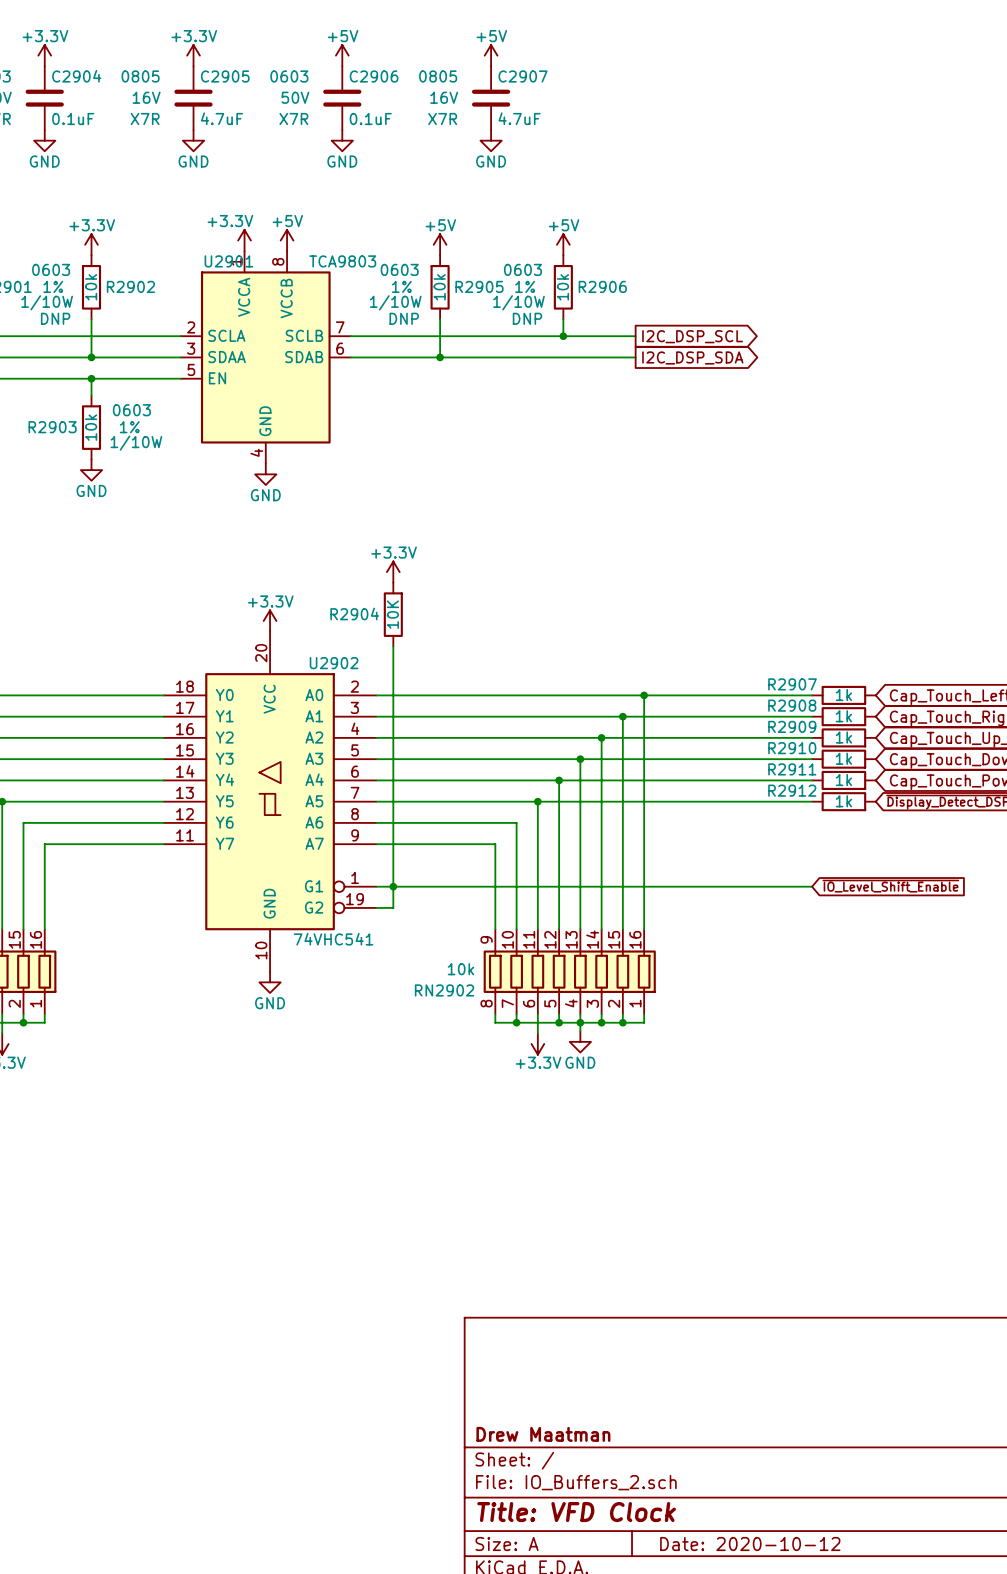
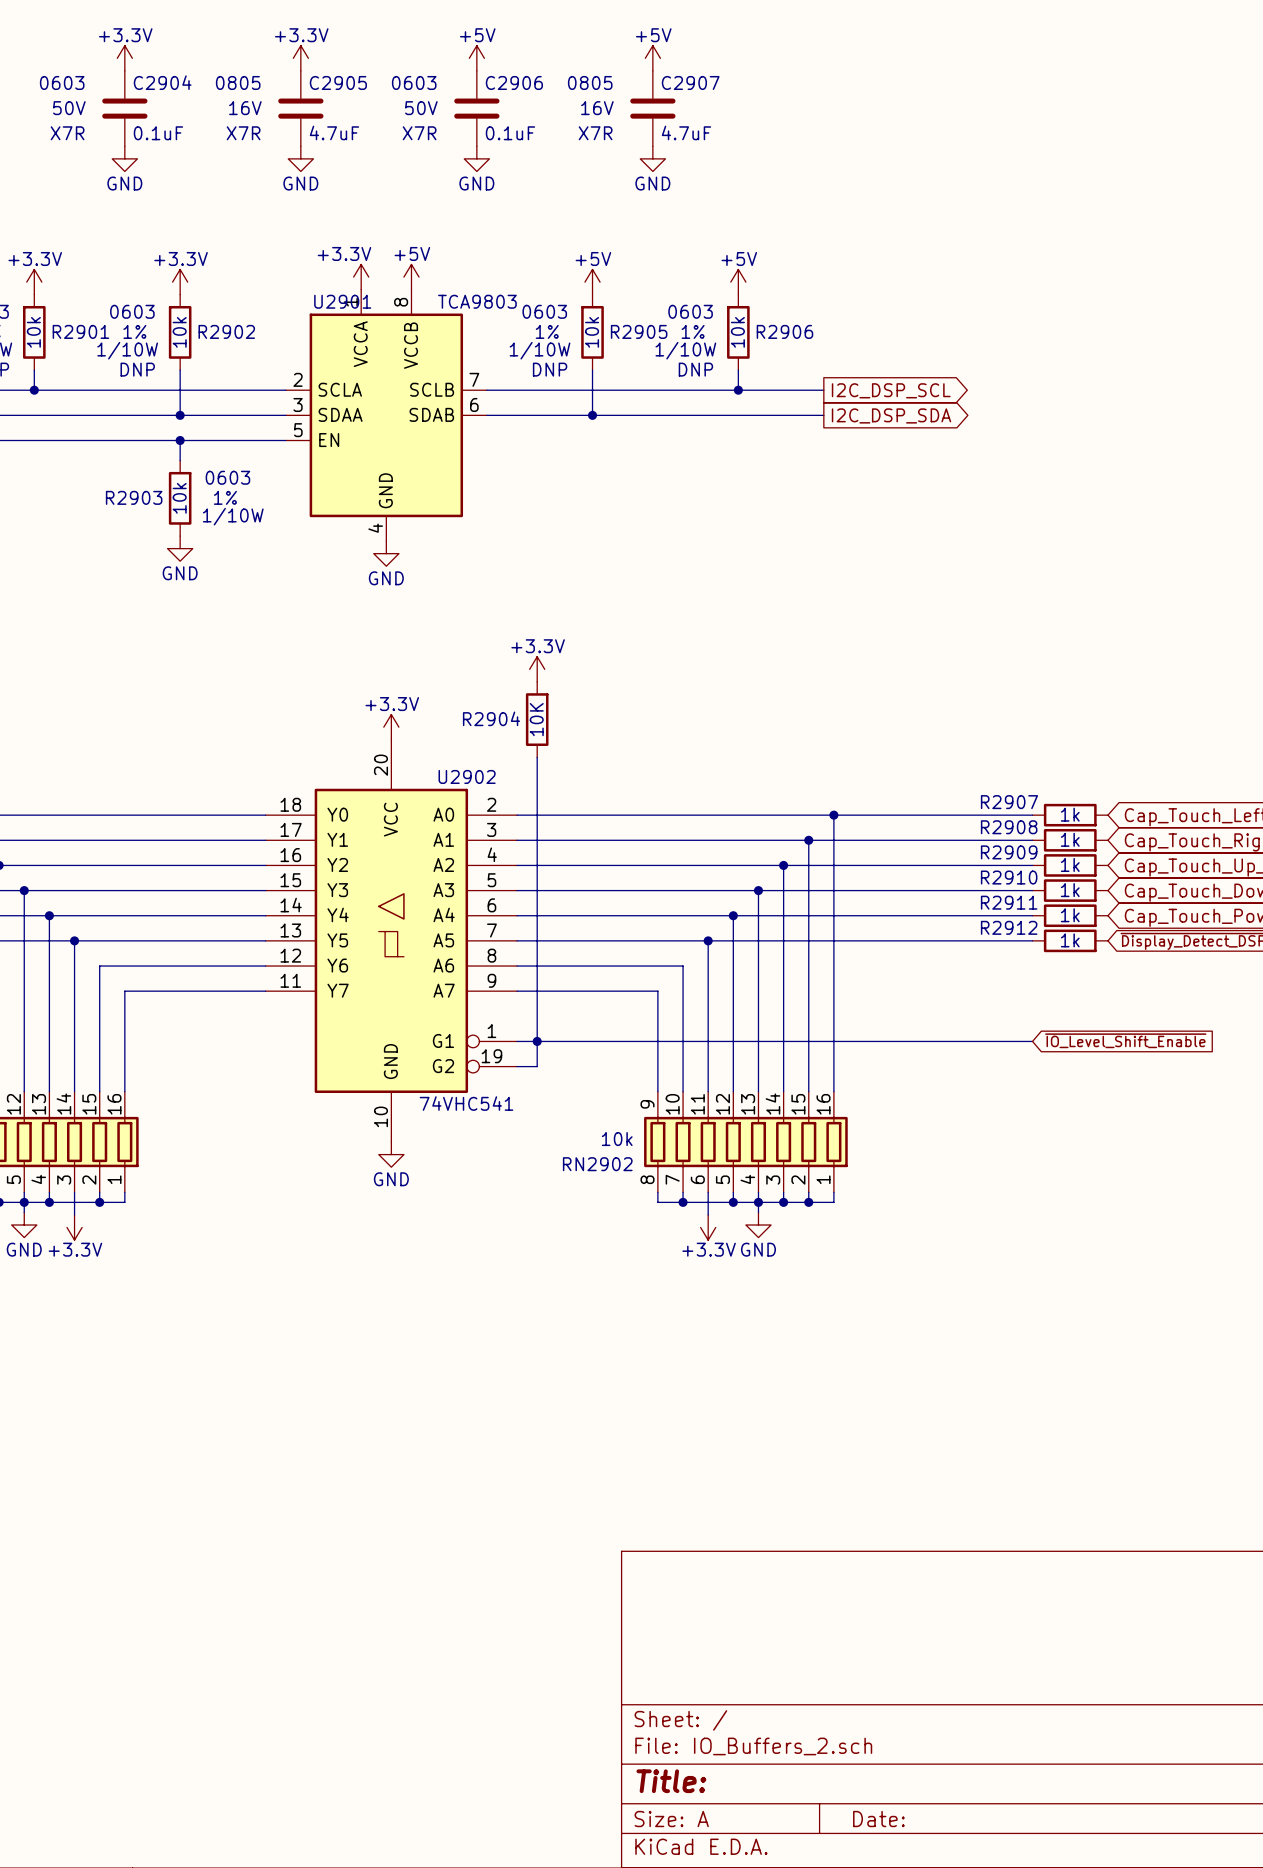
title block: Drew Maatman (543, 1434) -> none
title block: Title: VFD Clock (576, 1512) -> Title: (671, 1781)
title block: Date: 2020-10-12 (750, 1544) -> Date: (878, 1819)

